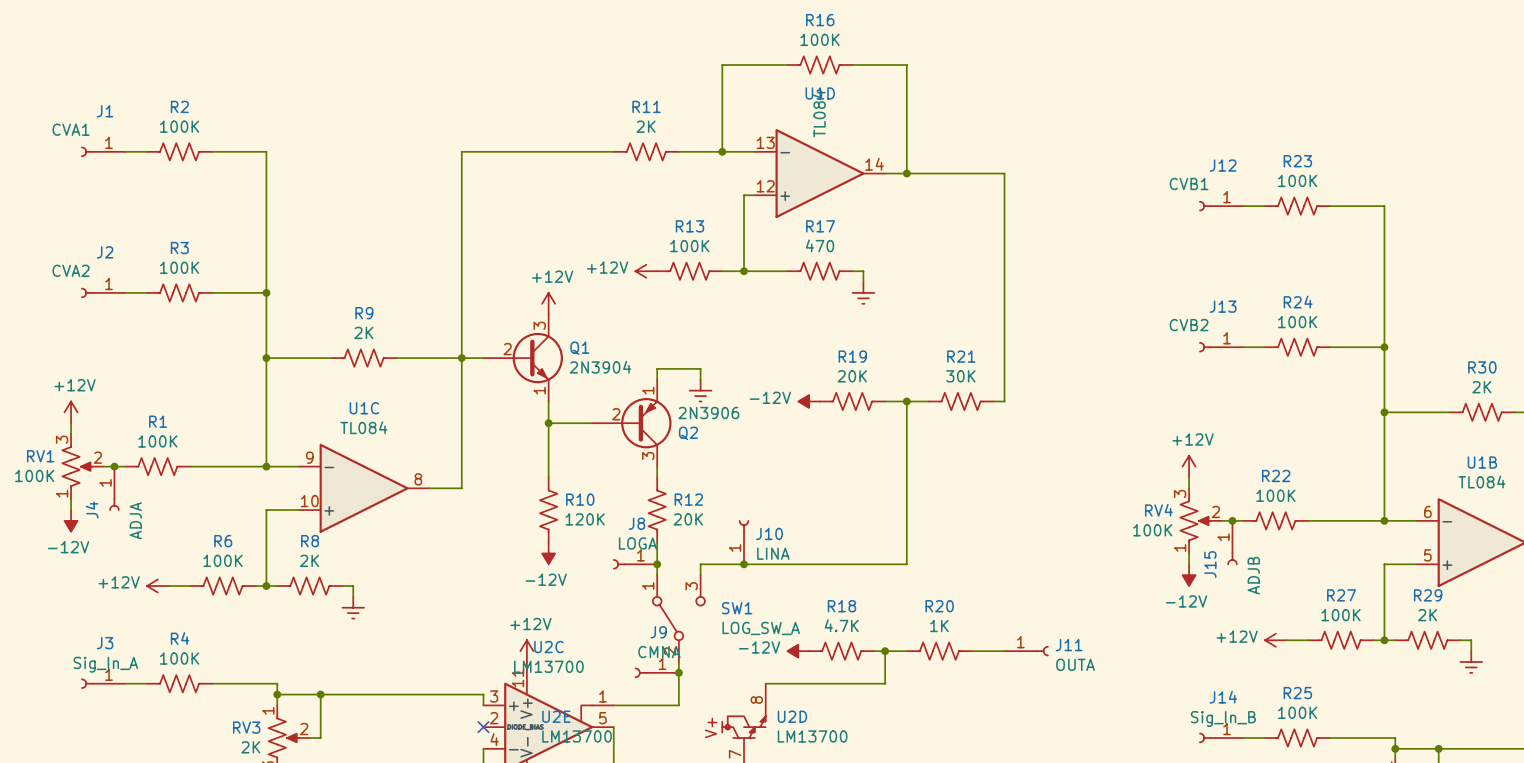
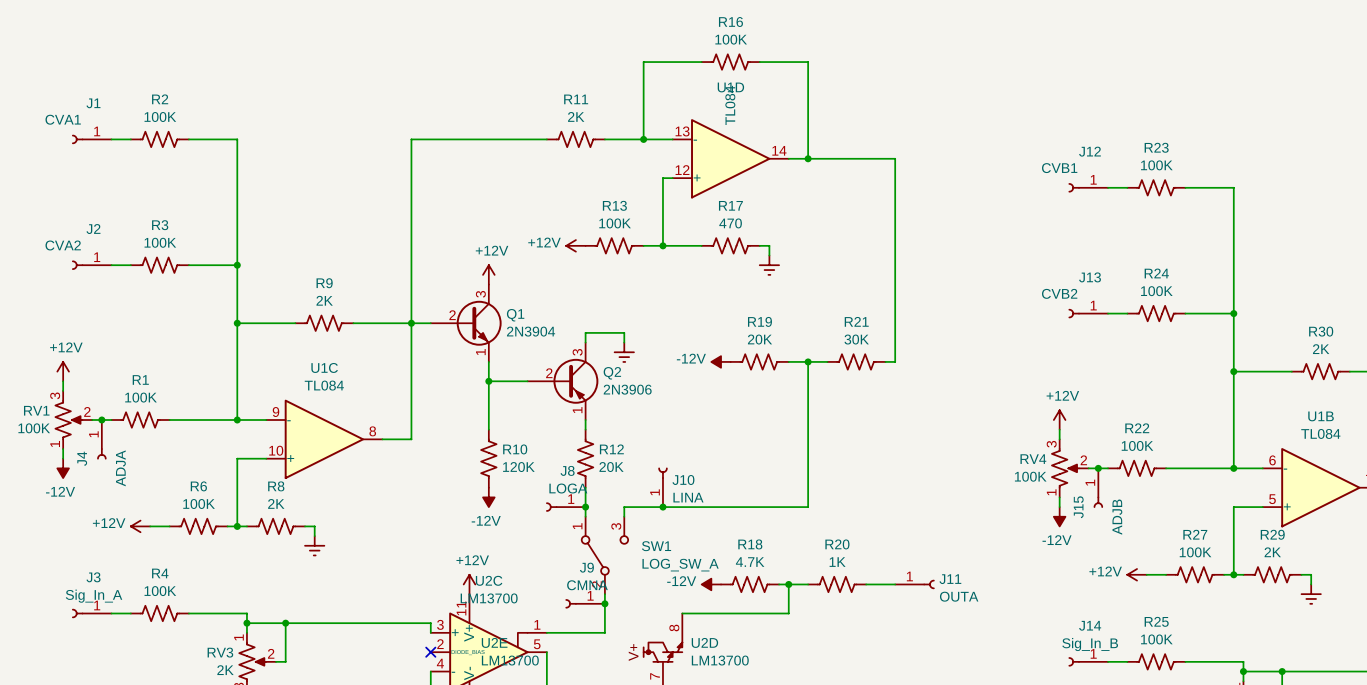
Q2 flip: as is (646, 423) -> up-down (575, 381)

